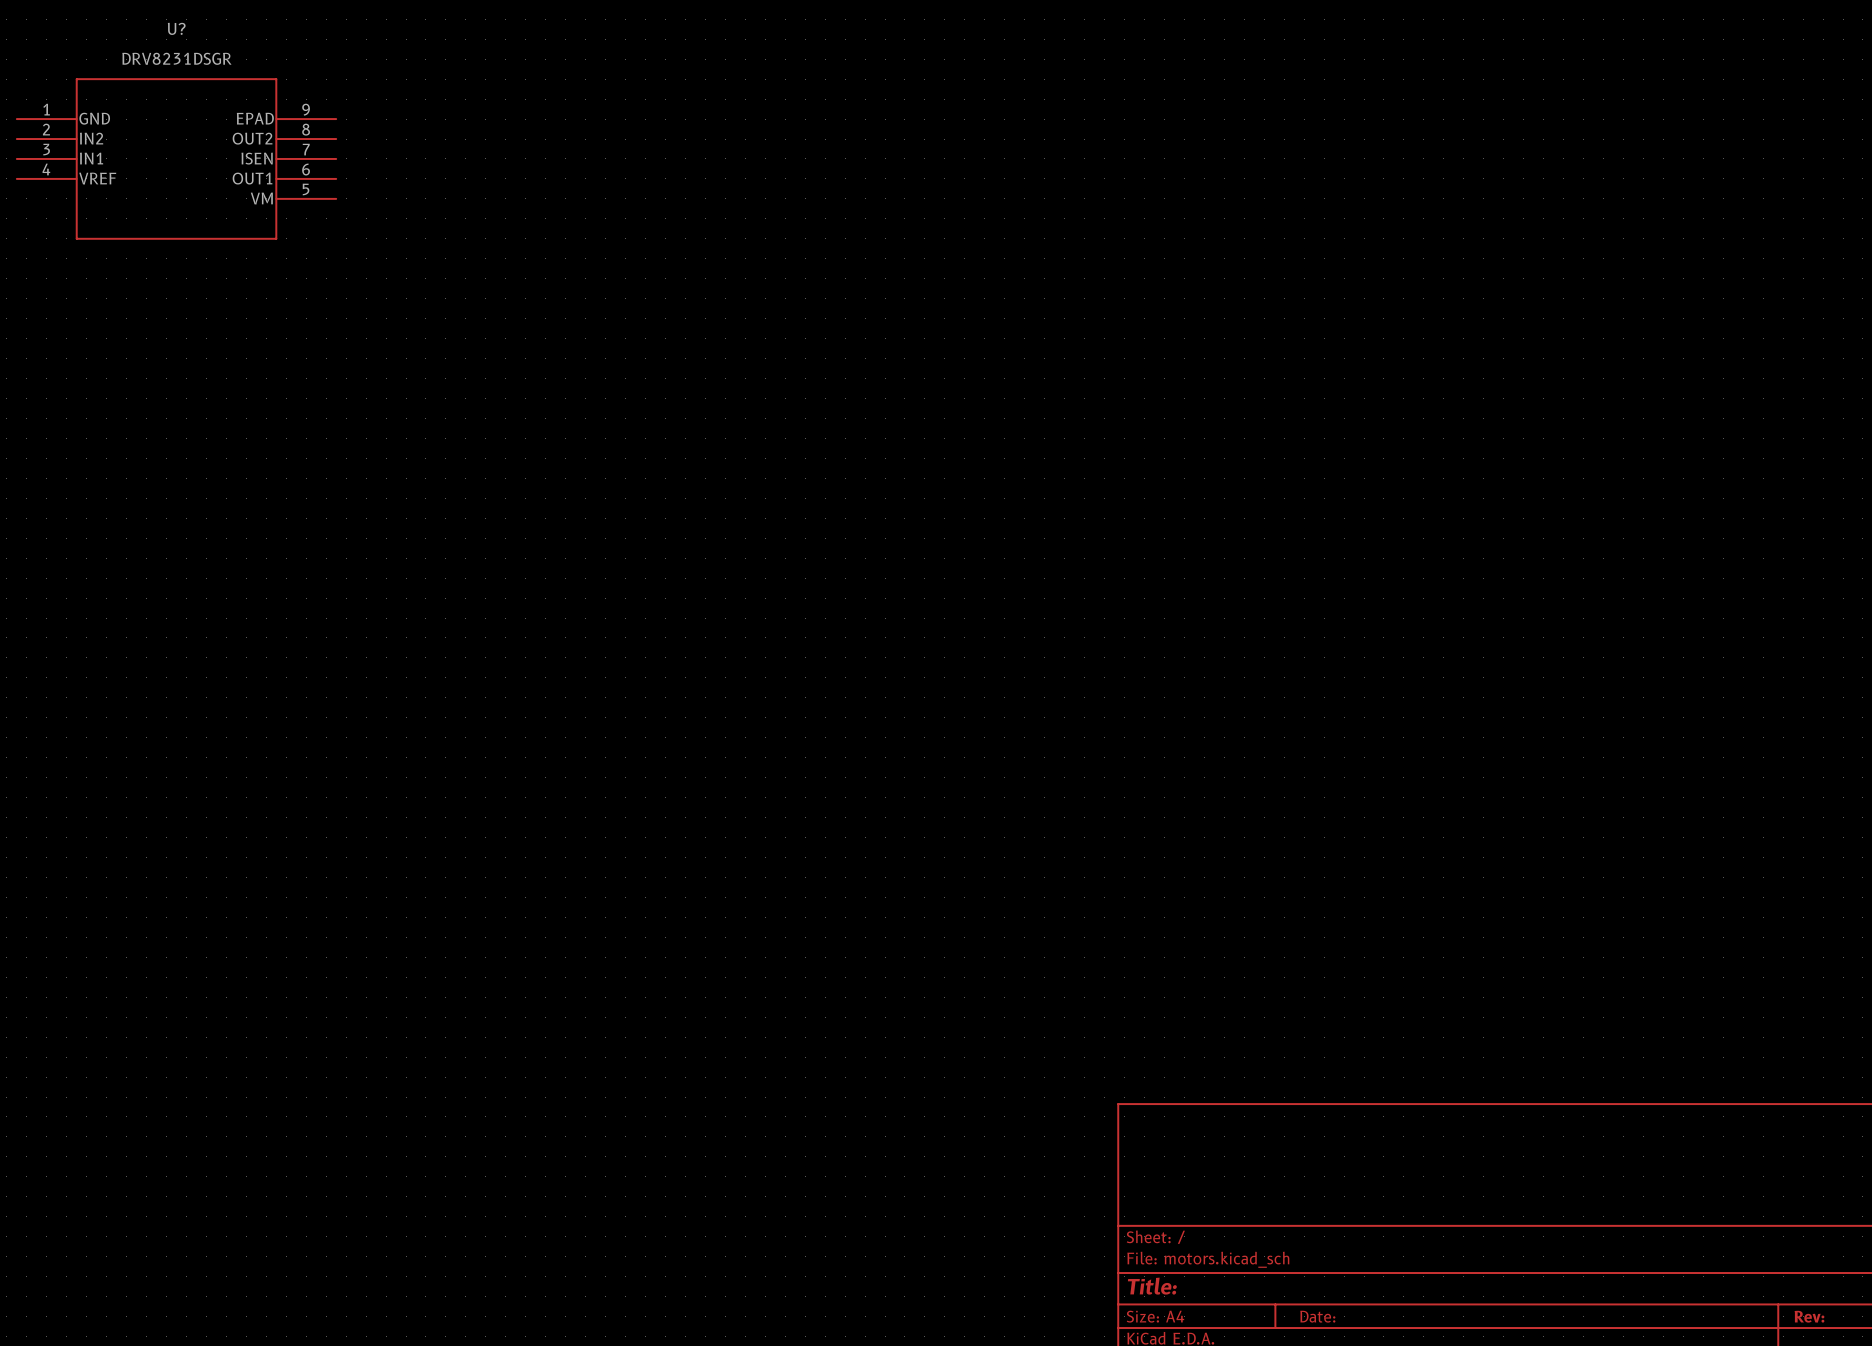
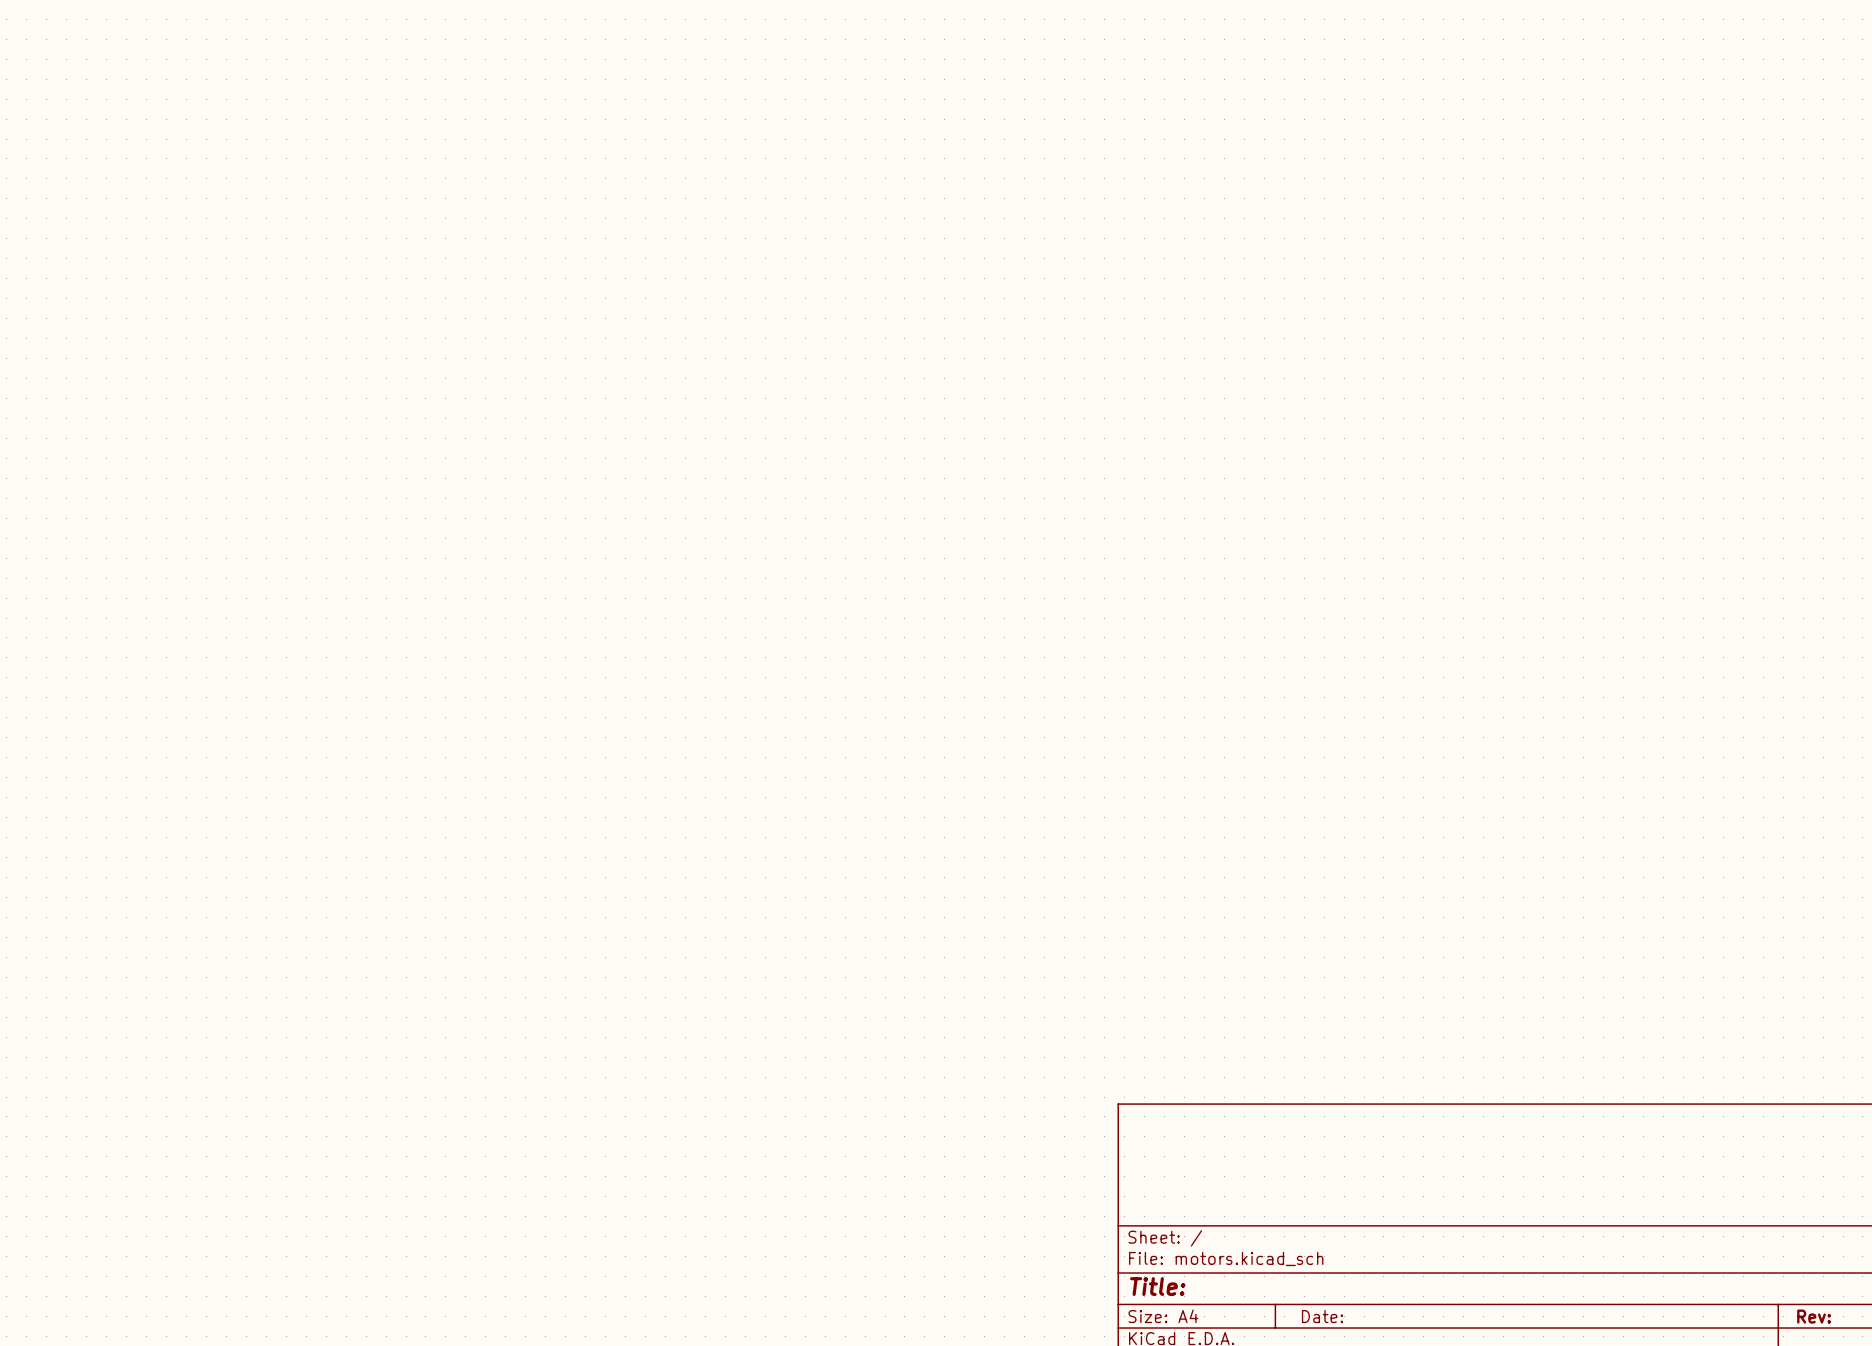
U?: DRV8231DSGR (176, 158) -> none

